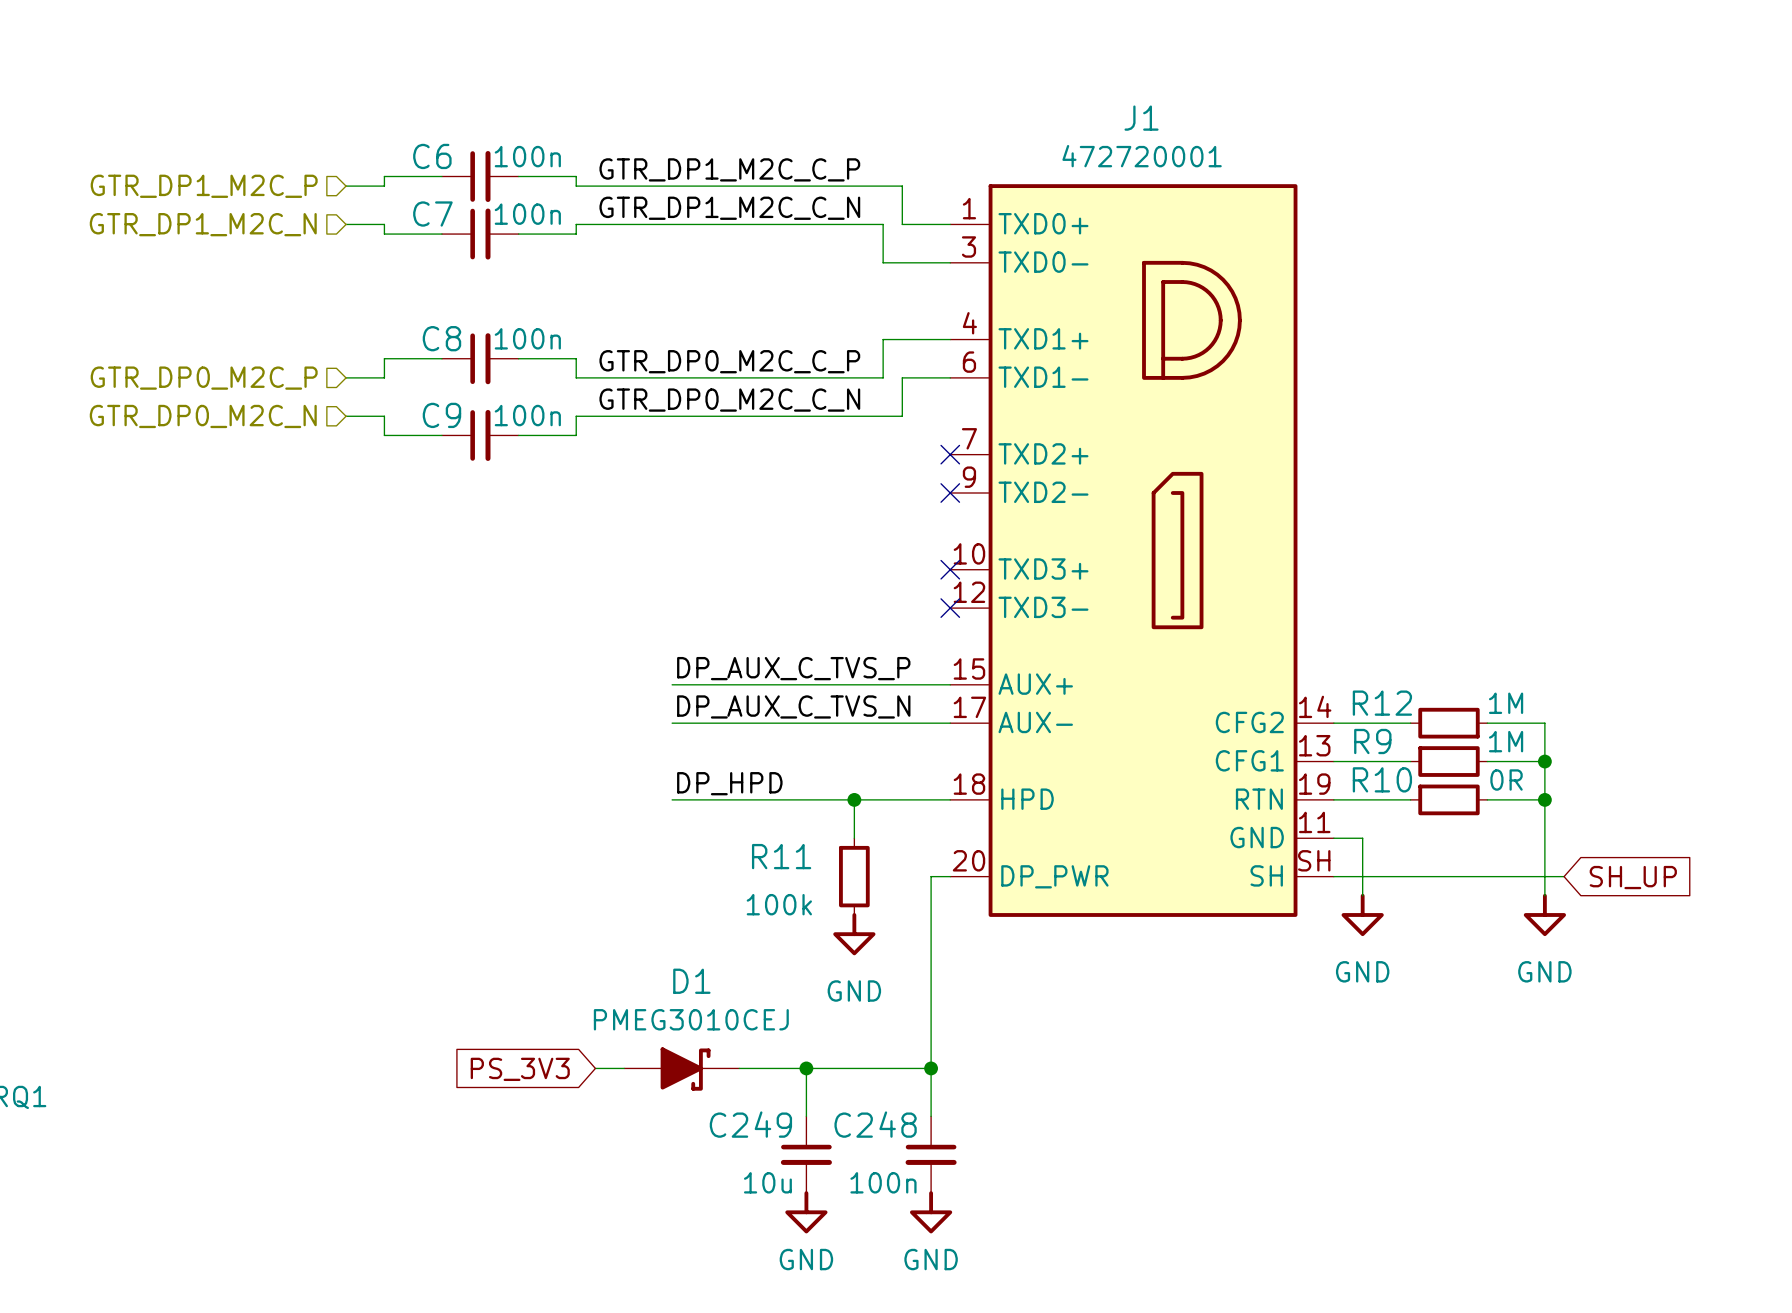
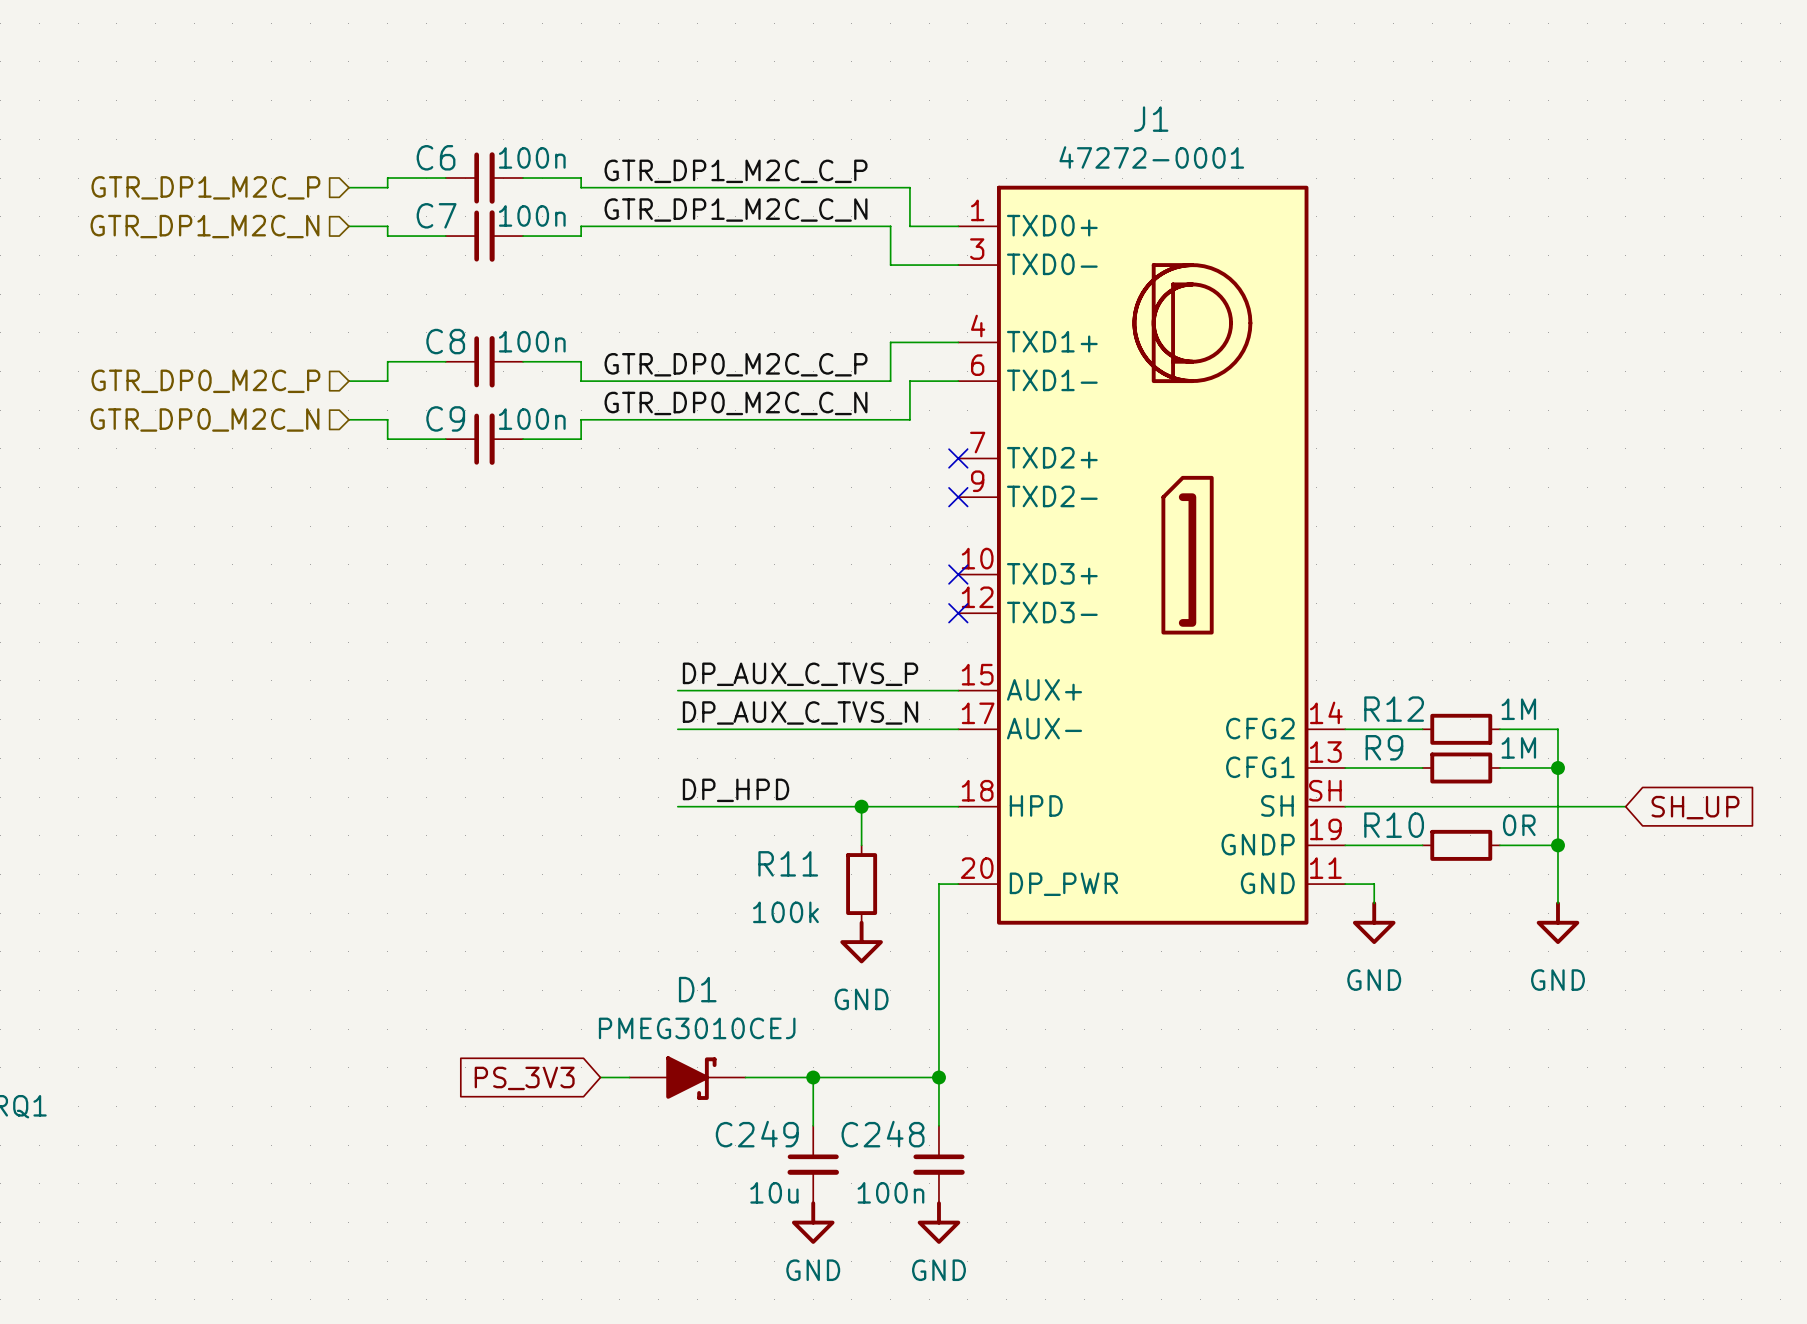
J1 text: 472720001 (1142, 156) -> 47272-0001 (1151, 157)
J1 symbol: [950, 184, 1334, 917] -> [958, 185, 1346, 925]
wire: none -> (1422, 806) (1499, 806)
R10 position: (1448, 799) -> (1461, 845)
wire: none -> (1557, 806) (1625, 806)
junction position: (1544, 799) -> (1557, 845)
wire: (1362, 838) (1362, 876) (1564, 876) -> (1374, 845) (1422, 845)
wire: none -> (1499, 845) (1557, 845)
global label position: SH_UP (1633, 877) -> SH_UP (1695, 807)

